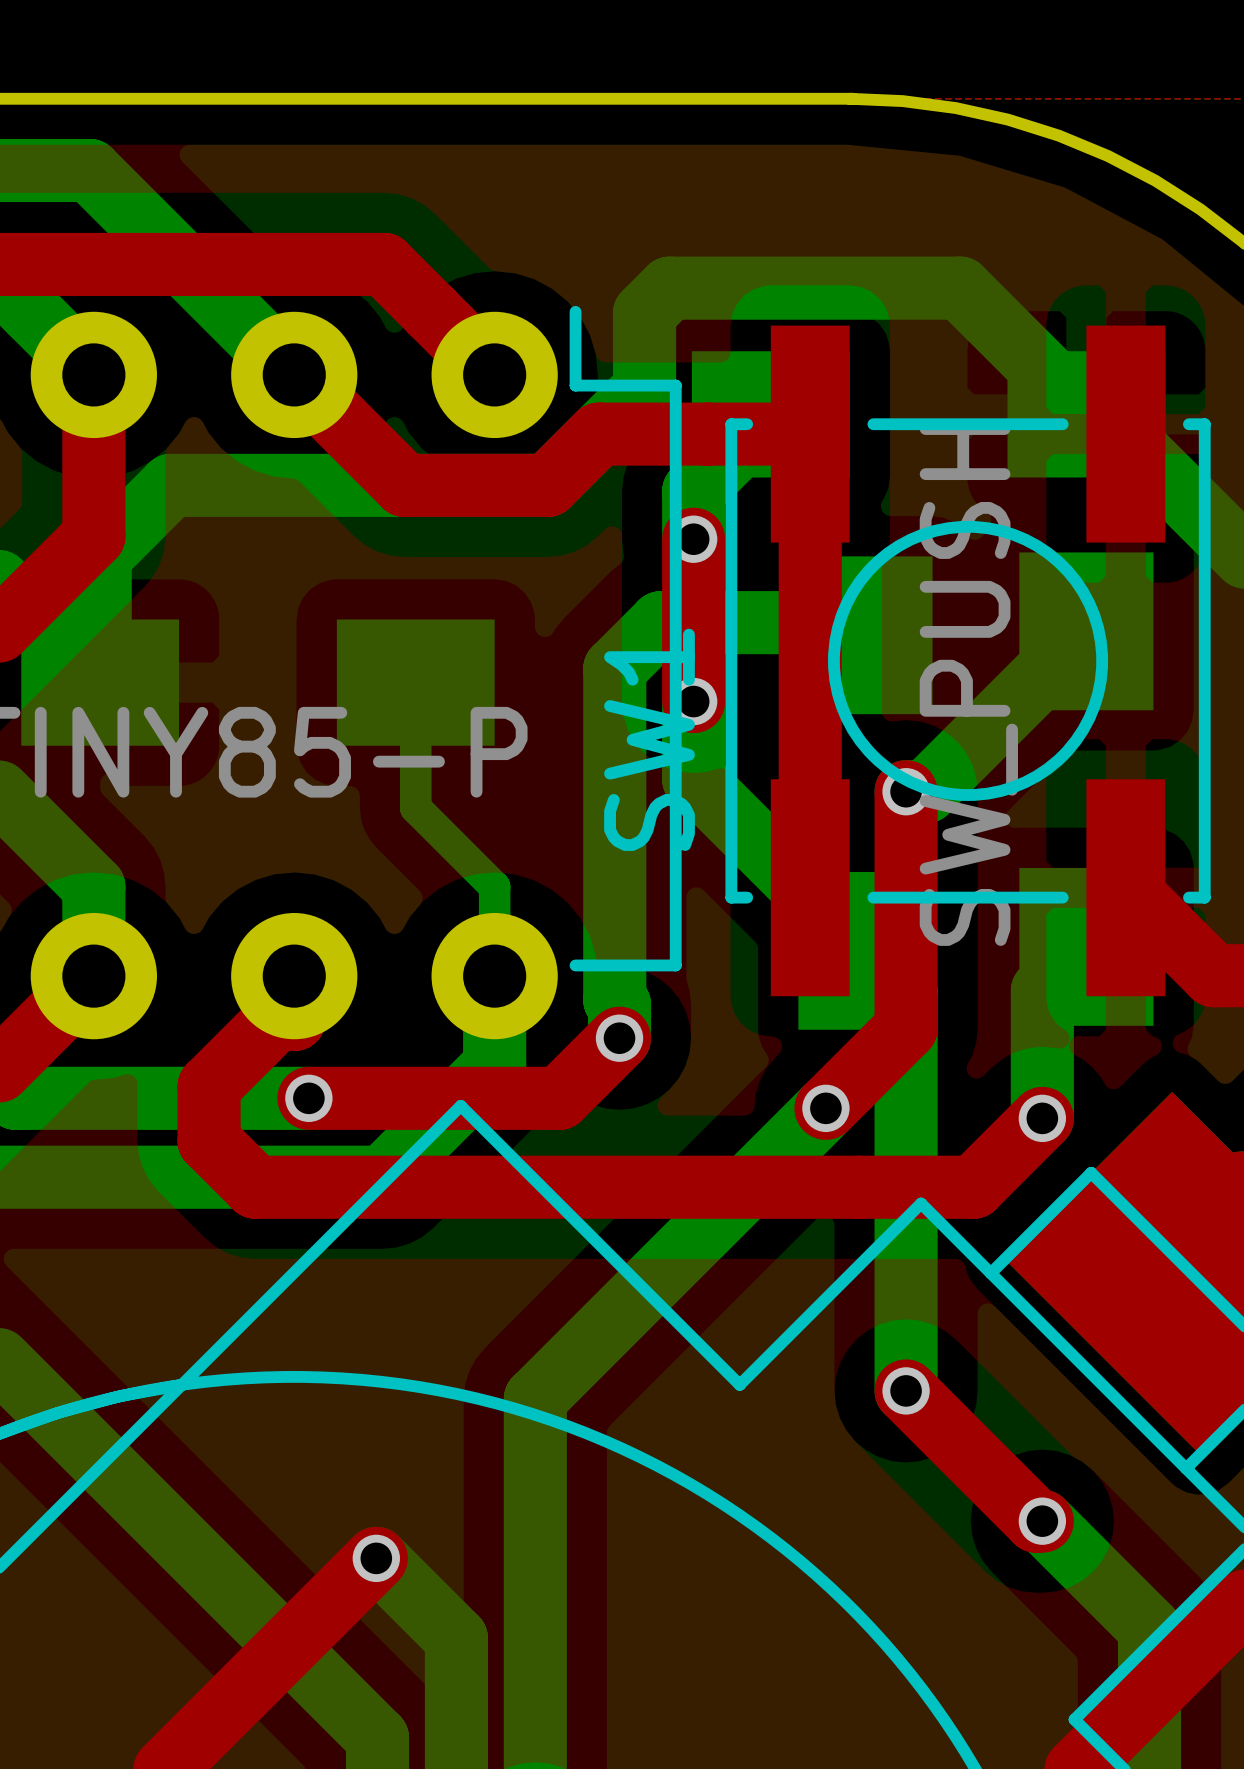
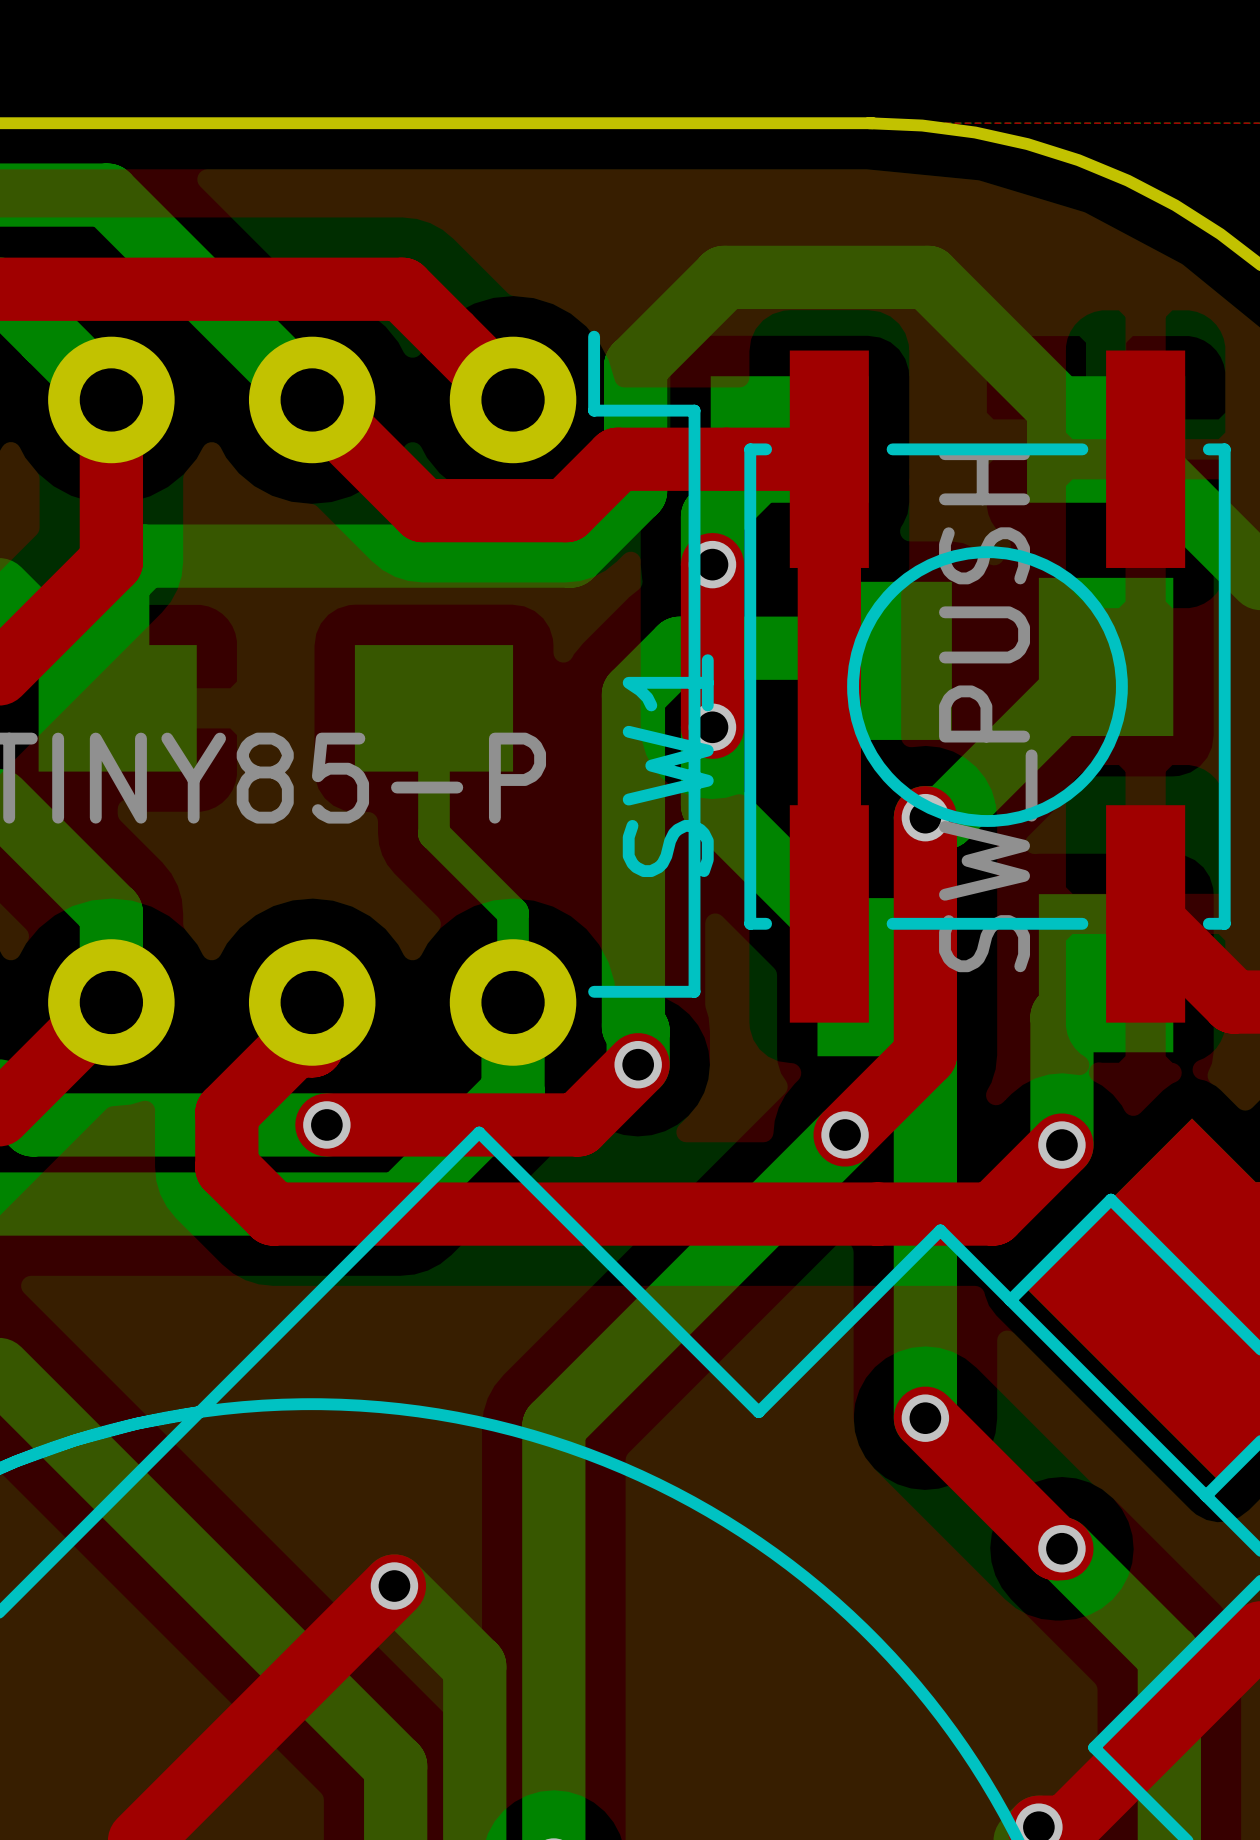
bottom track: (669, 288) (960, 288) (1086, 414) -> (688, 312) (724, 277) (928, 277) (1090, 439) (1106, 439)
bottom track: (644, 313) (644, 388) (547, 485) (171, 485) (125, 530) -> (663, 338) (635, 365) (635, 490) (570, 556) (143, 556)

